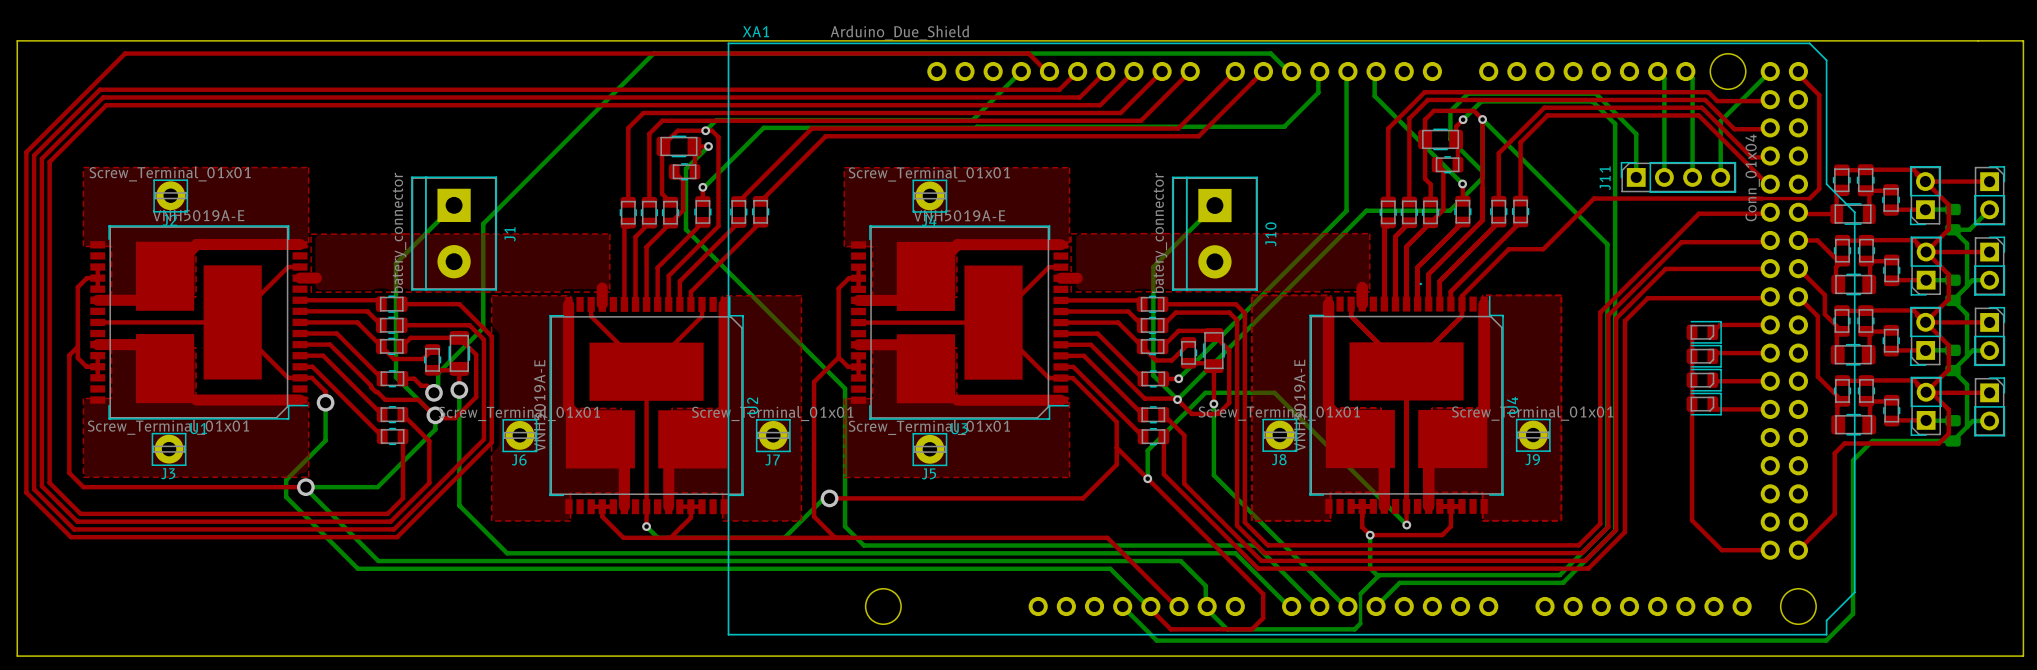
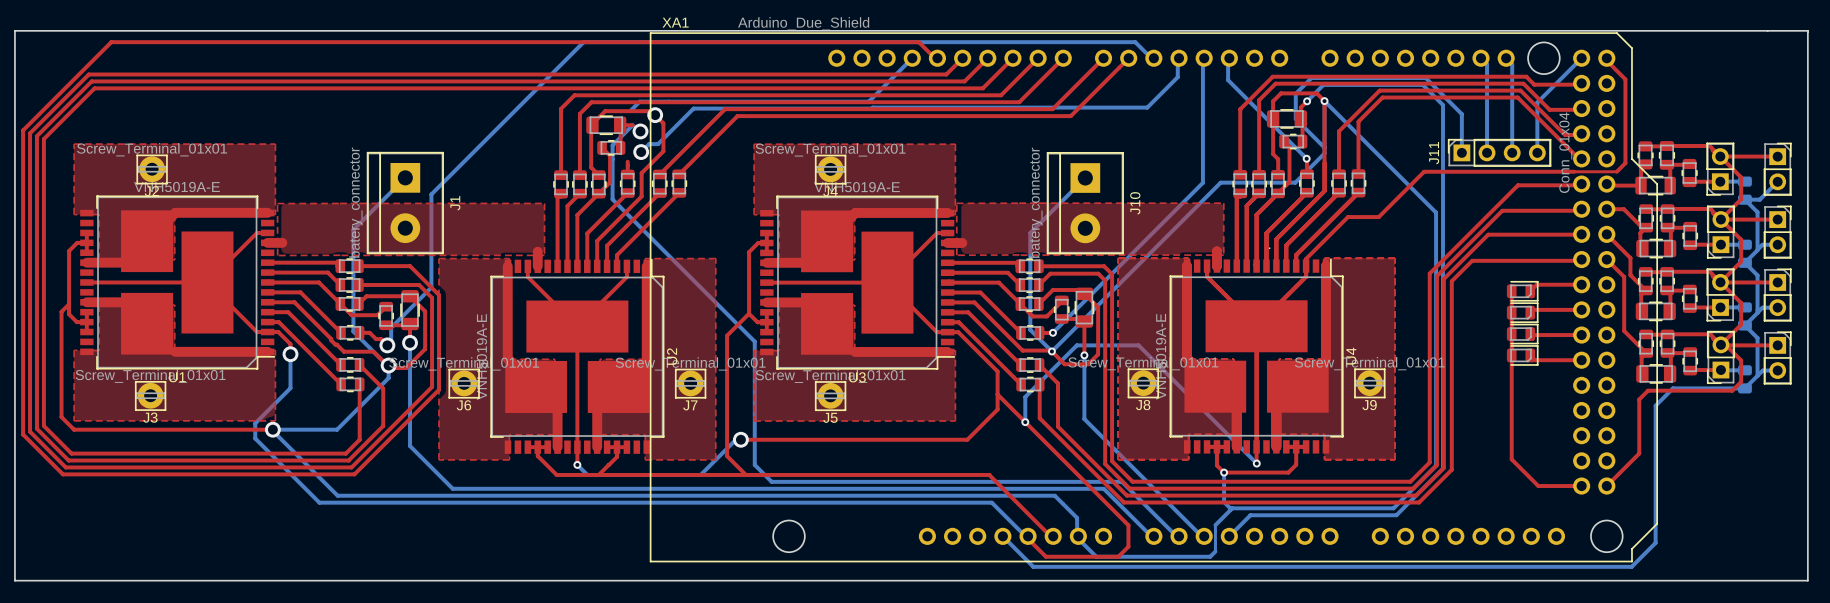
bottom track: (776, 127) (763, 127) (702, 188) -> (693, 108) (658, 144) (649, 144) (641, 152)
via: (705, 130) -> none
top track: (711, 130) (718, 137) (718, 200) -> (635, 111) (651, 111) (663, 123) (663, 151) (641, 173)
via: none -> (655, 115)
via: (708, 146) -> none
via: none -> (640, 131)
via: none -> (641, 152)
via: (702, 187) -> none

